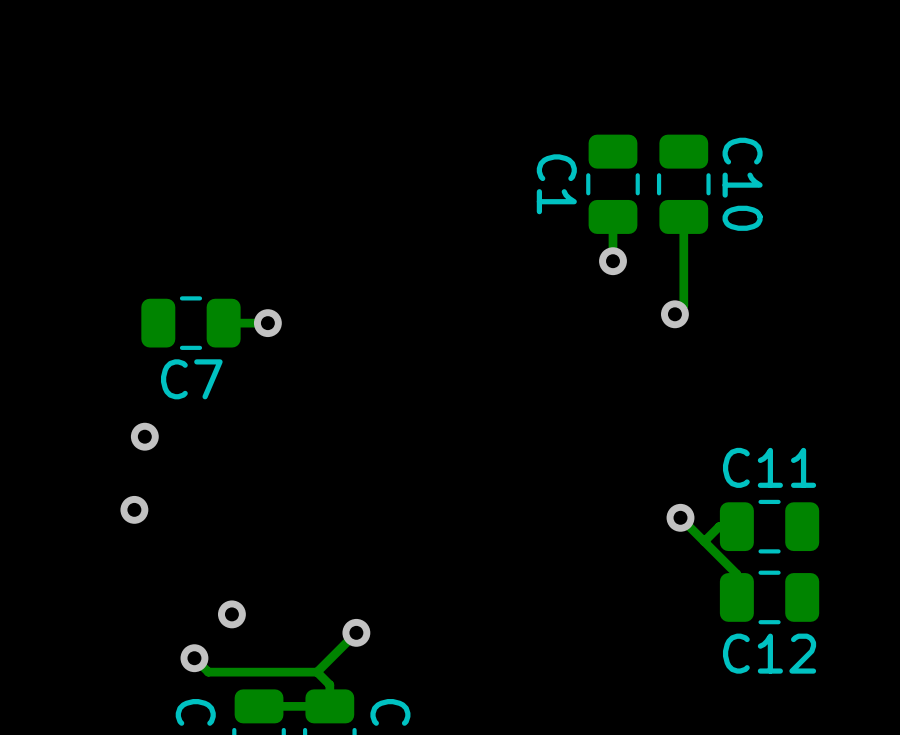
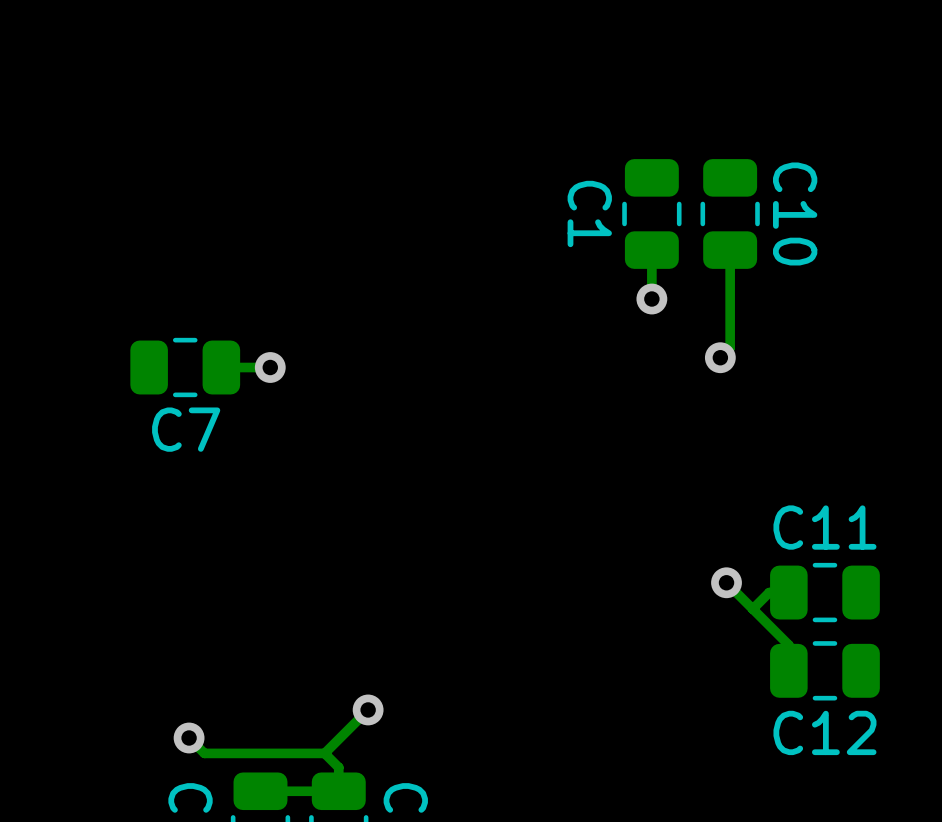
via: (144, 436) -> none
via: (134, 509) -> none
via: (231, 614) -> none

